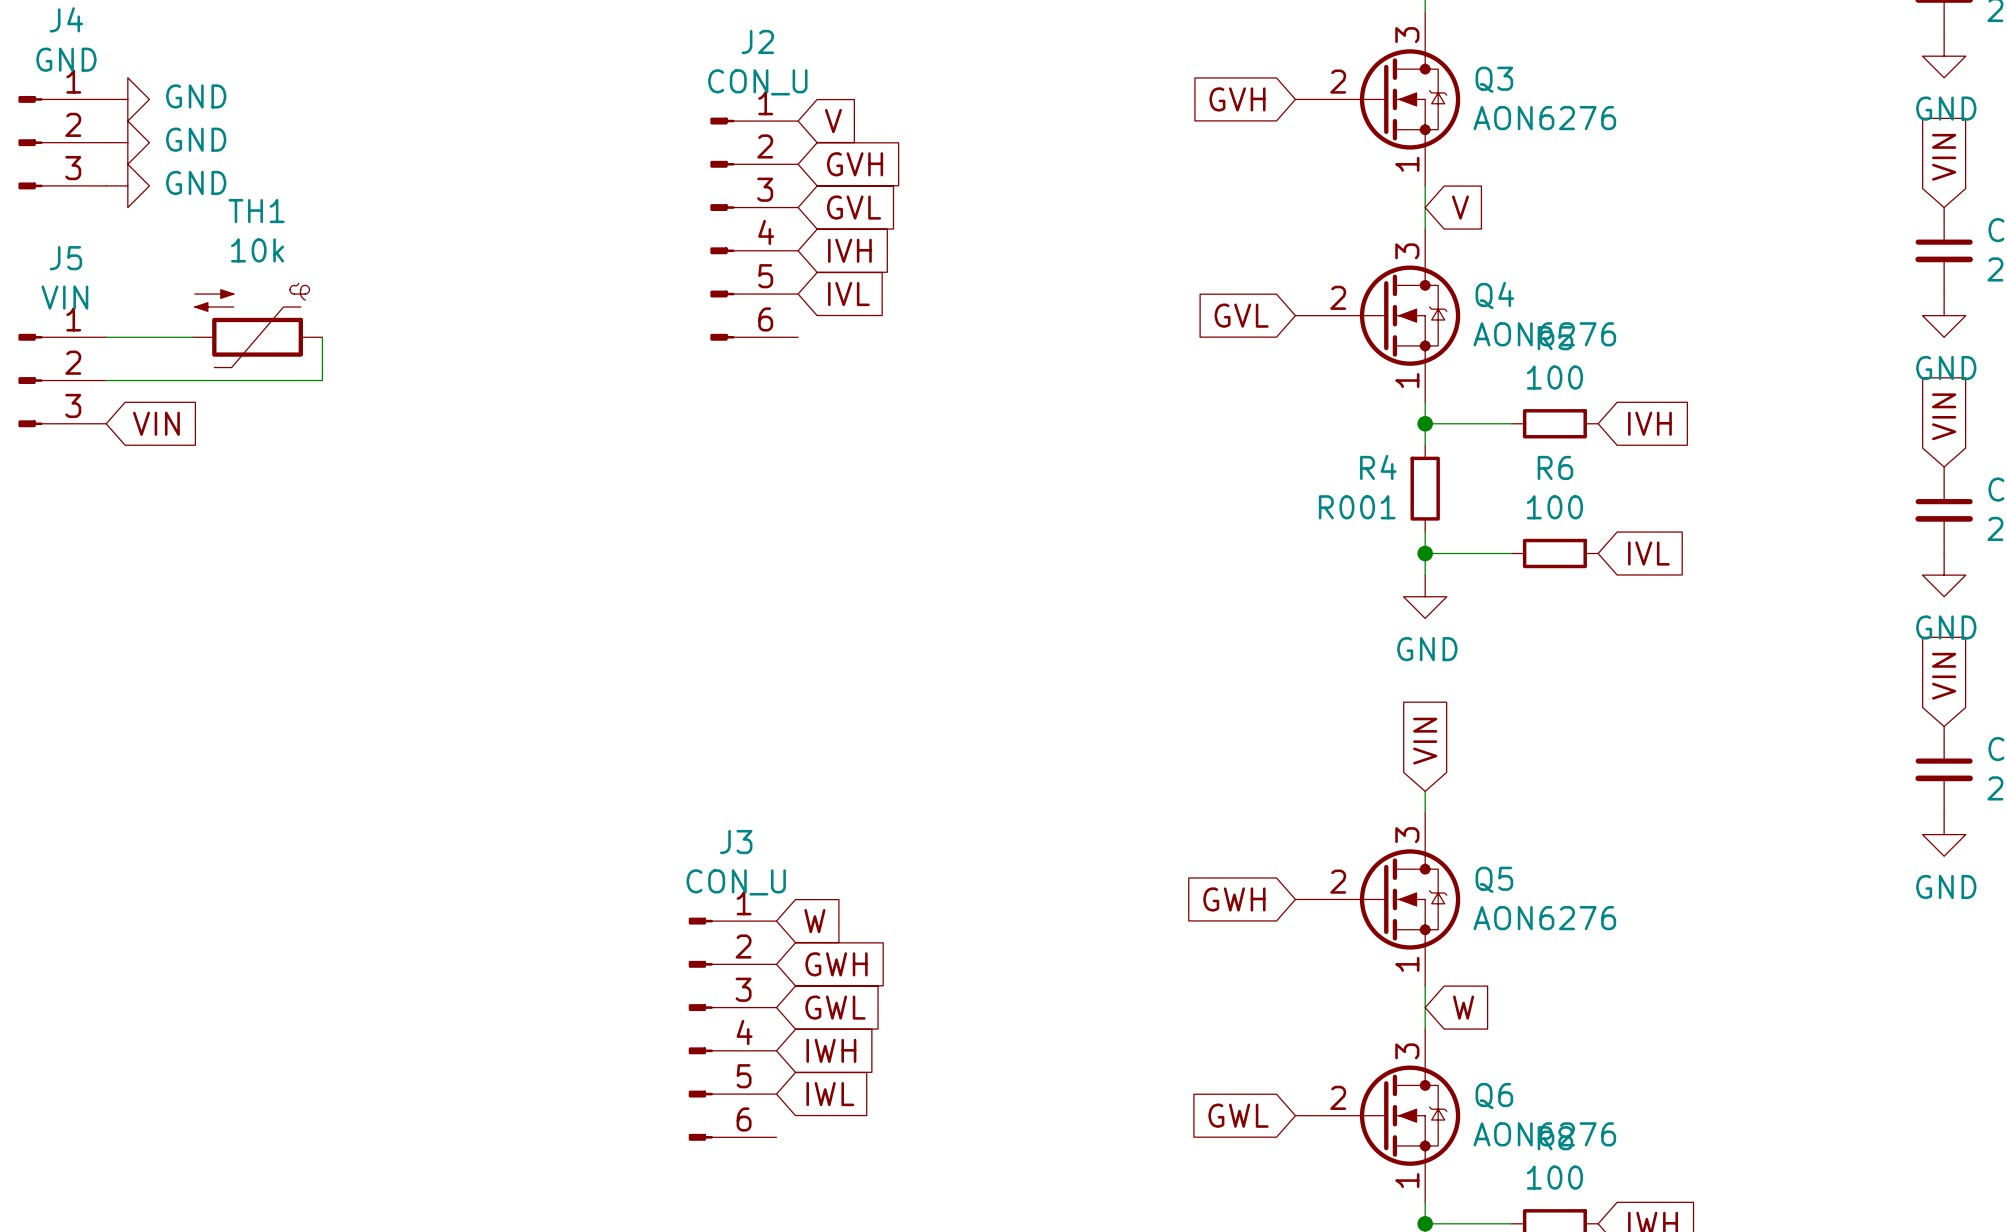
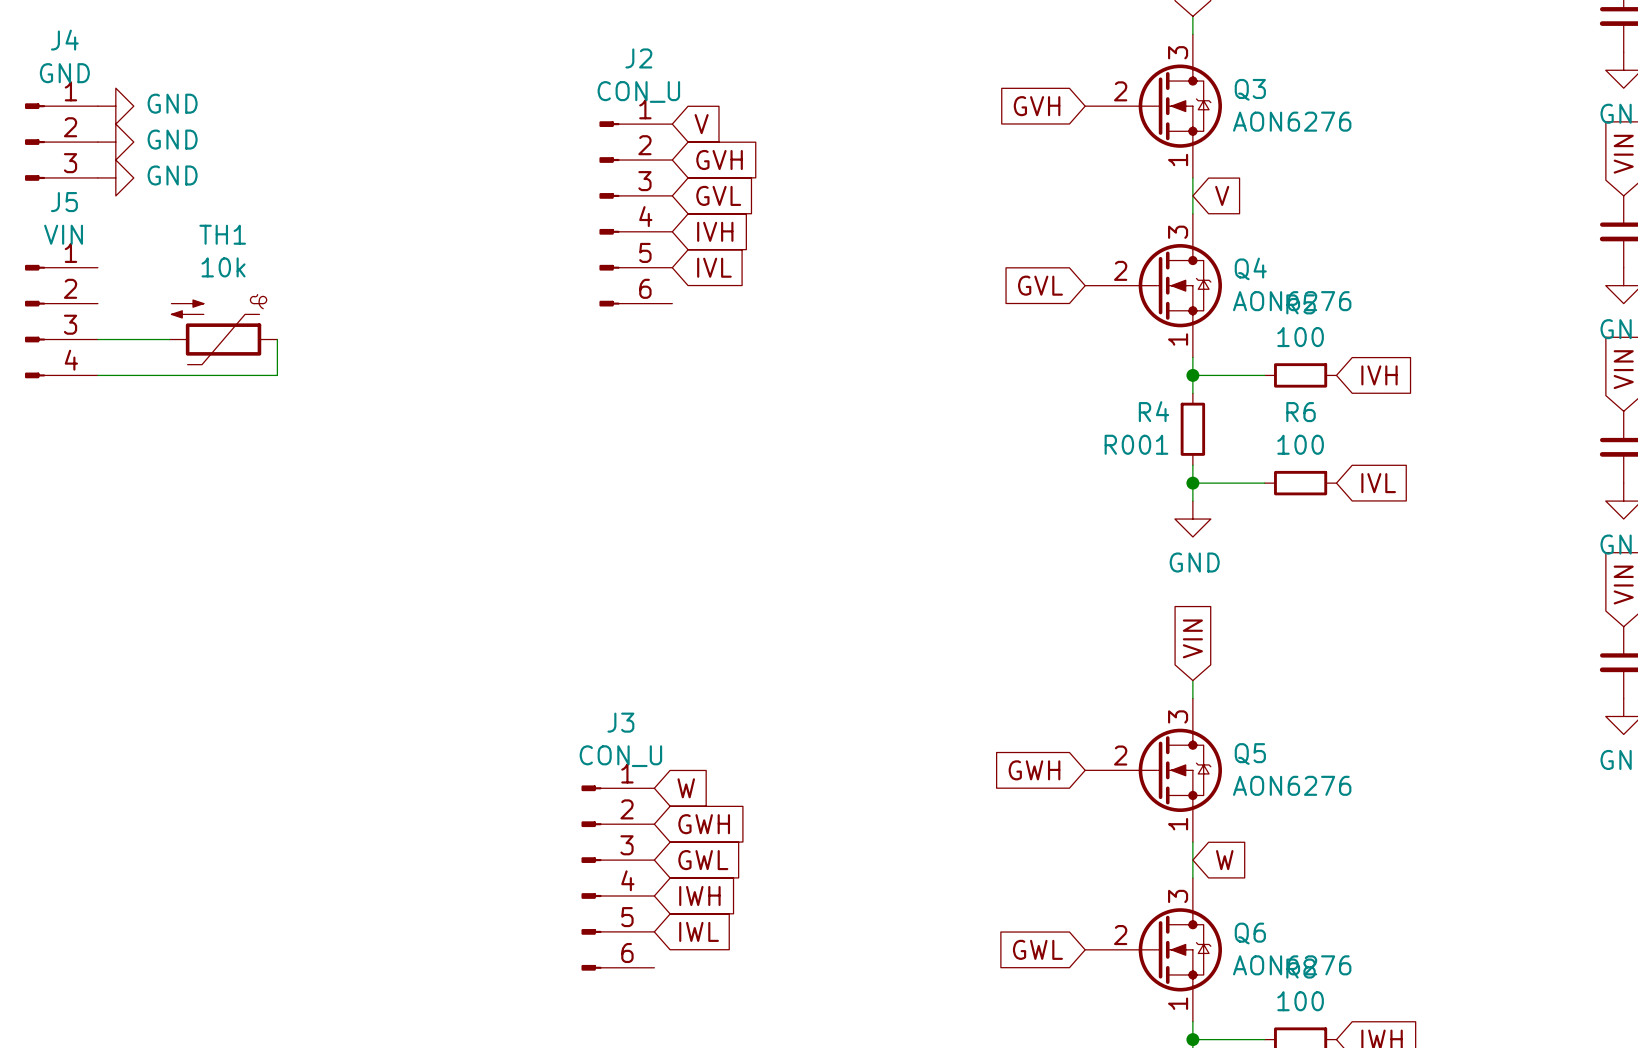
TH1 position: (257, 325) -> (223, 329)
J5 symbol: [18, 333, 107, 428] -> [25, 264, 98, 379]
wire: (106, 337) (192, 337) -> none
wire: (322, 337) (322, 380) (192, 380) -> none
wire: none -> (277, 339) (277, 375) (97, 375)
global label: VIN (156, 423) -> none

